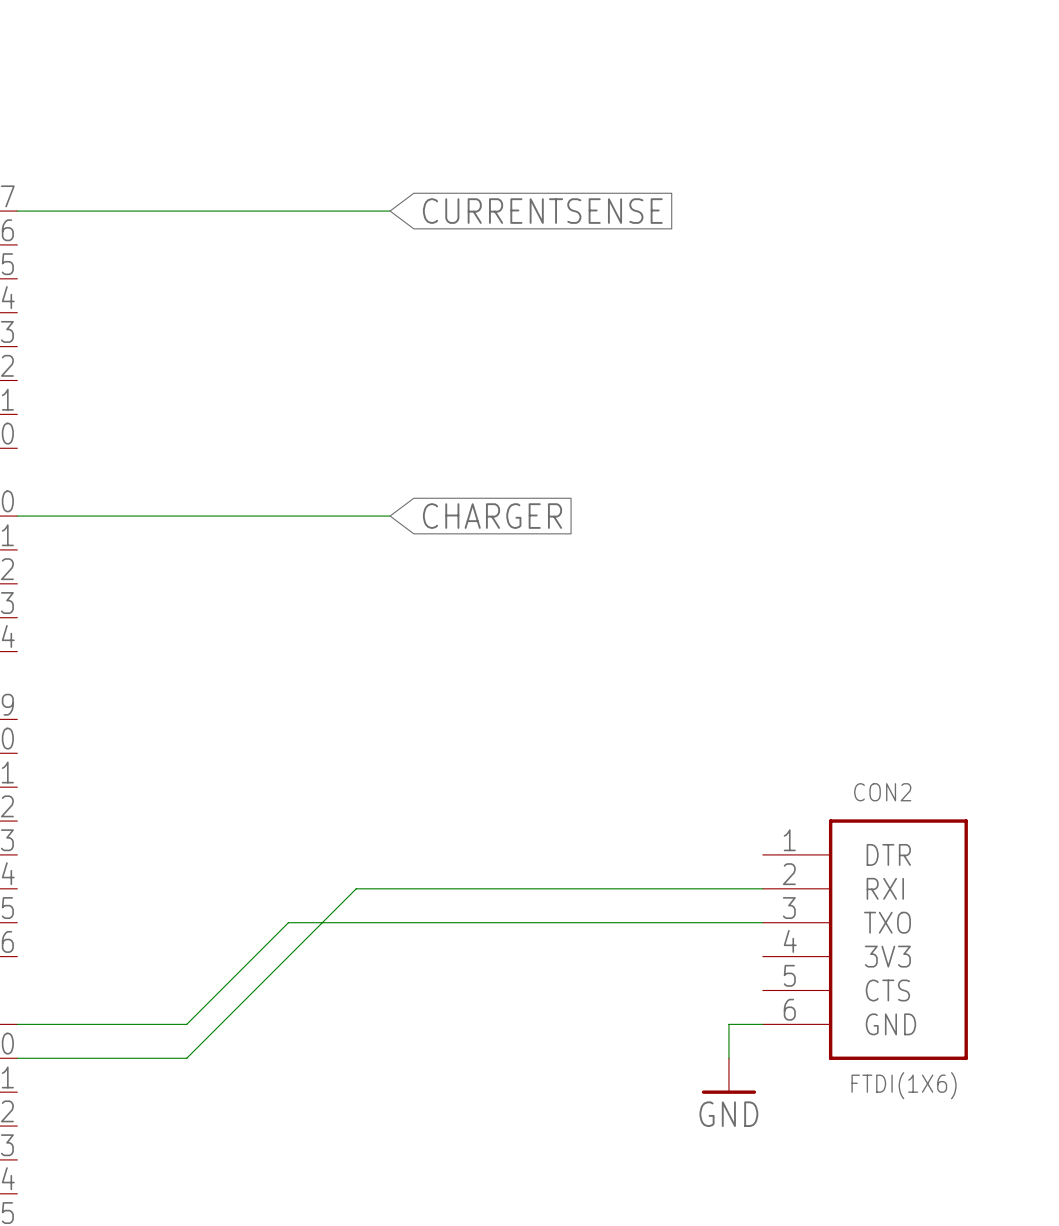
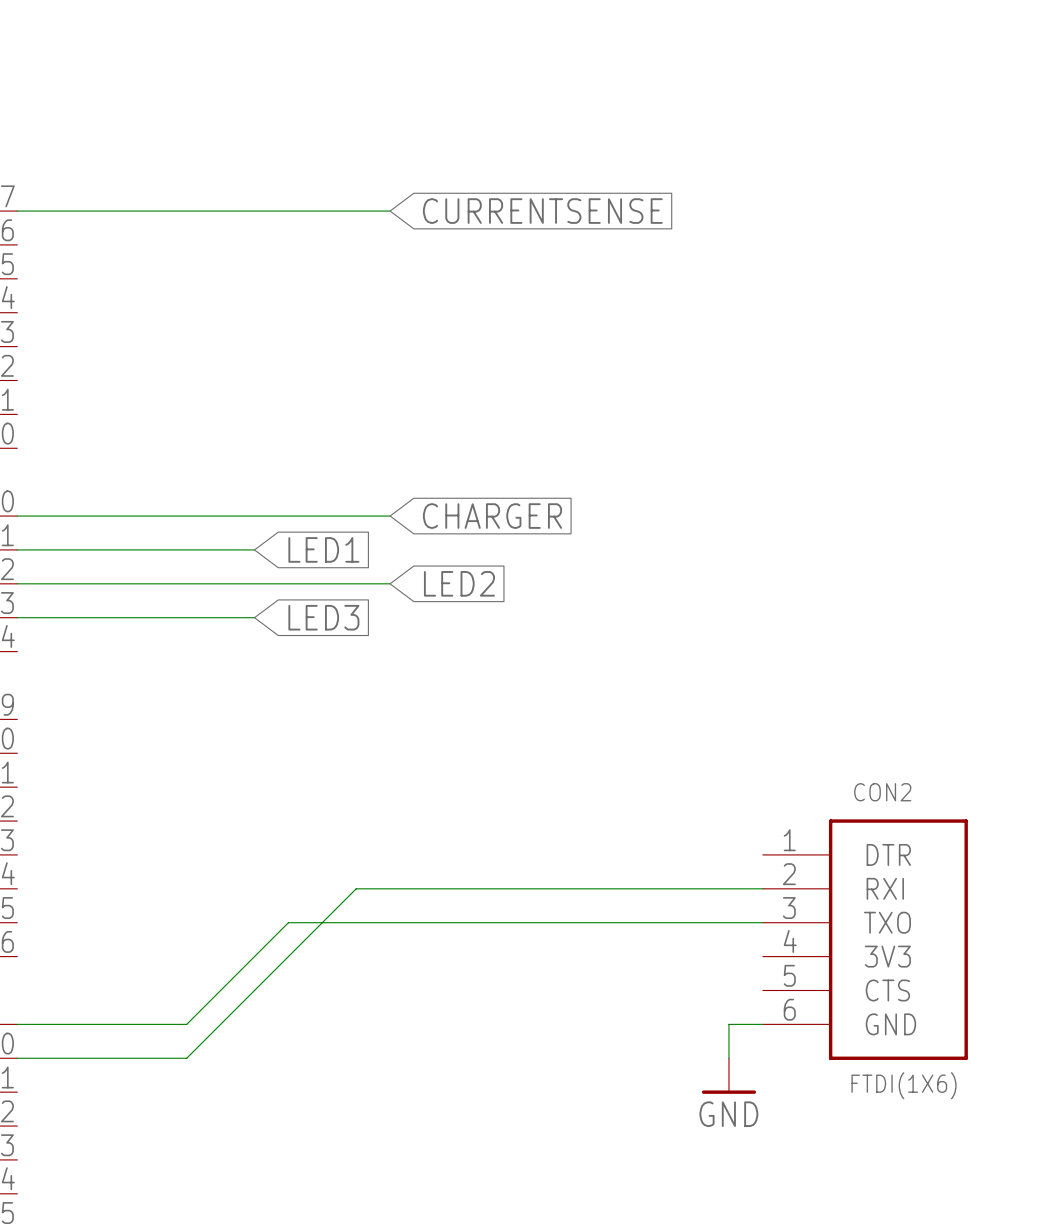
wire: none -> (17, 549) (254, 549)
global label: none -> LED1 (323, 549)
wire: none -> (17, 583) (390, 583)
global label: none -> LED2 (459, 583)
wire: none -> (17, 617) (254, 617)
global label: none -> LED3 (323, 617)

